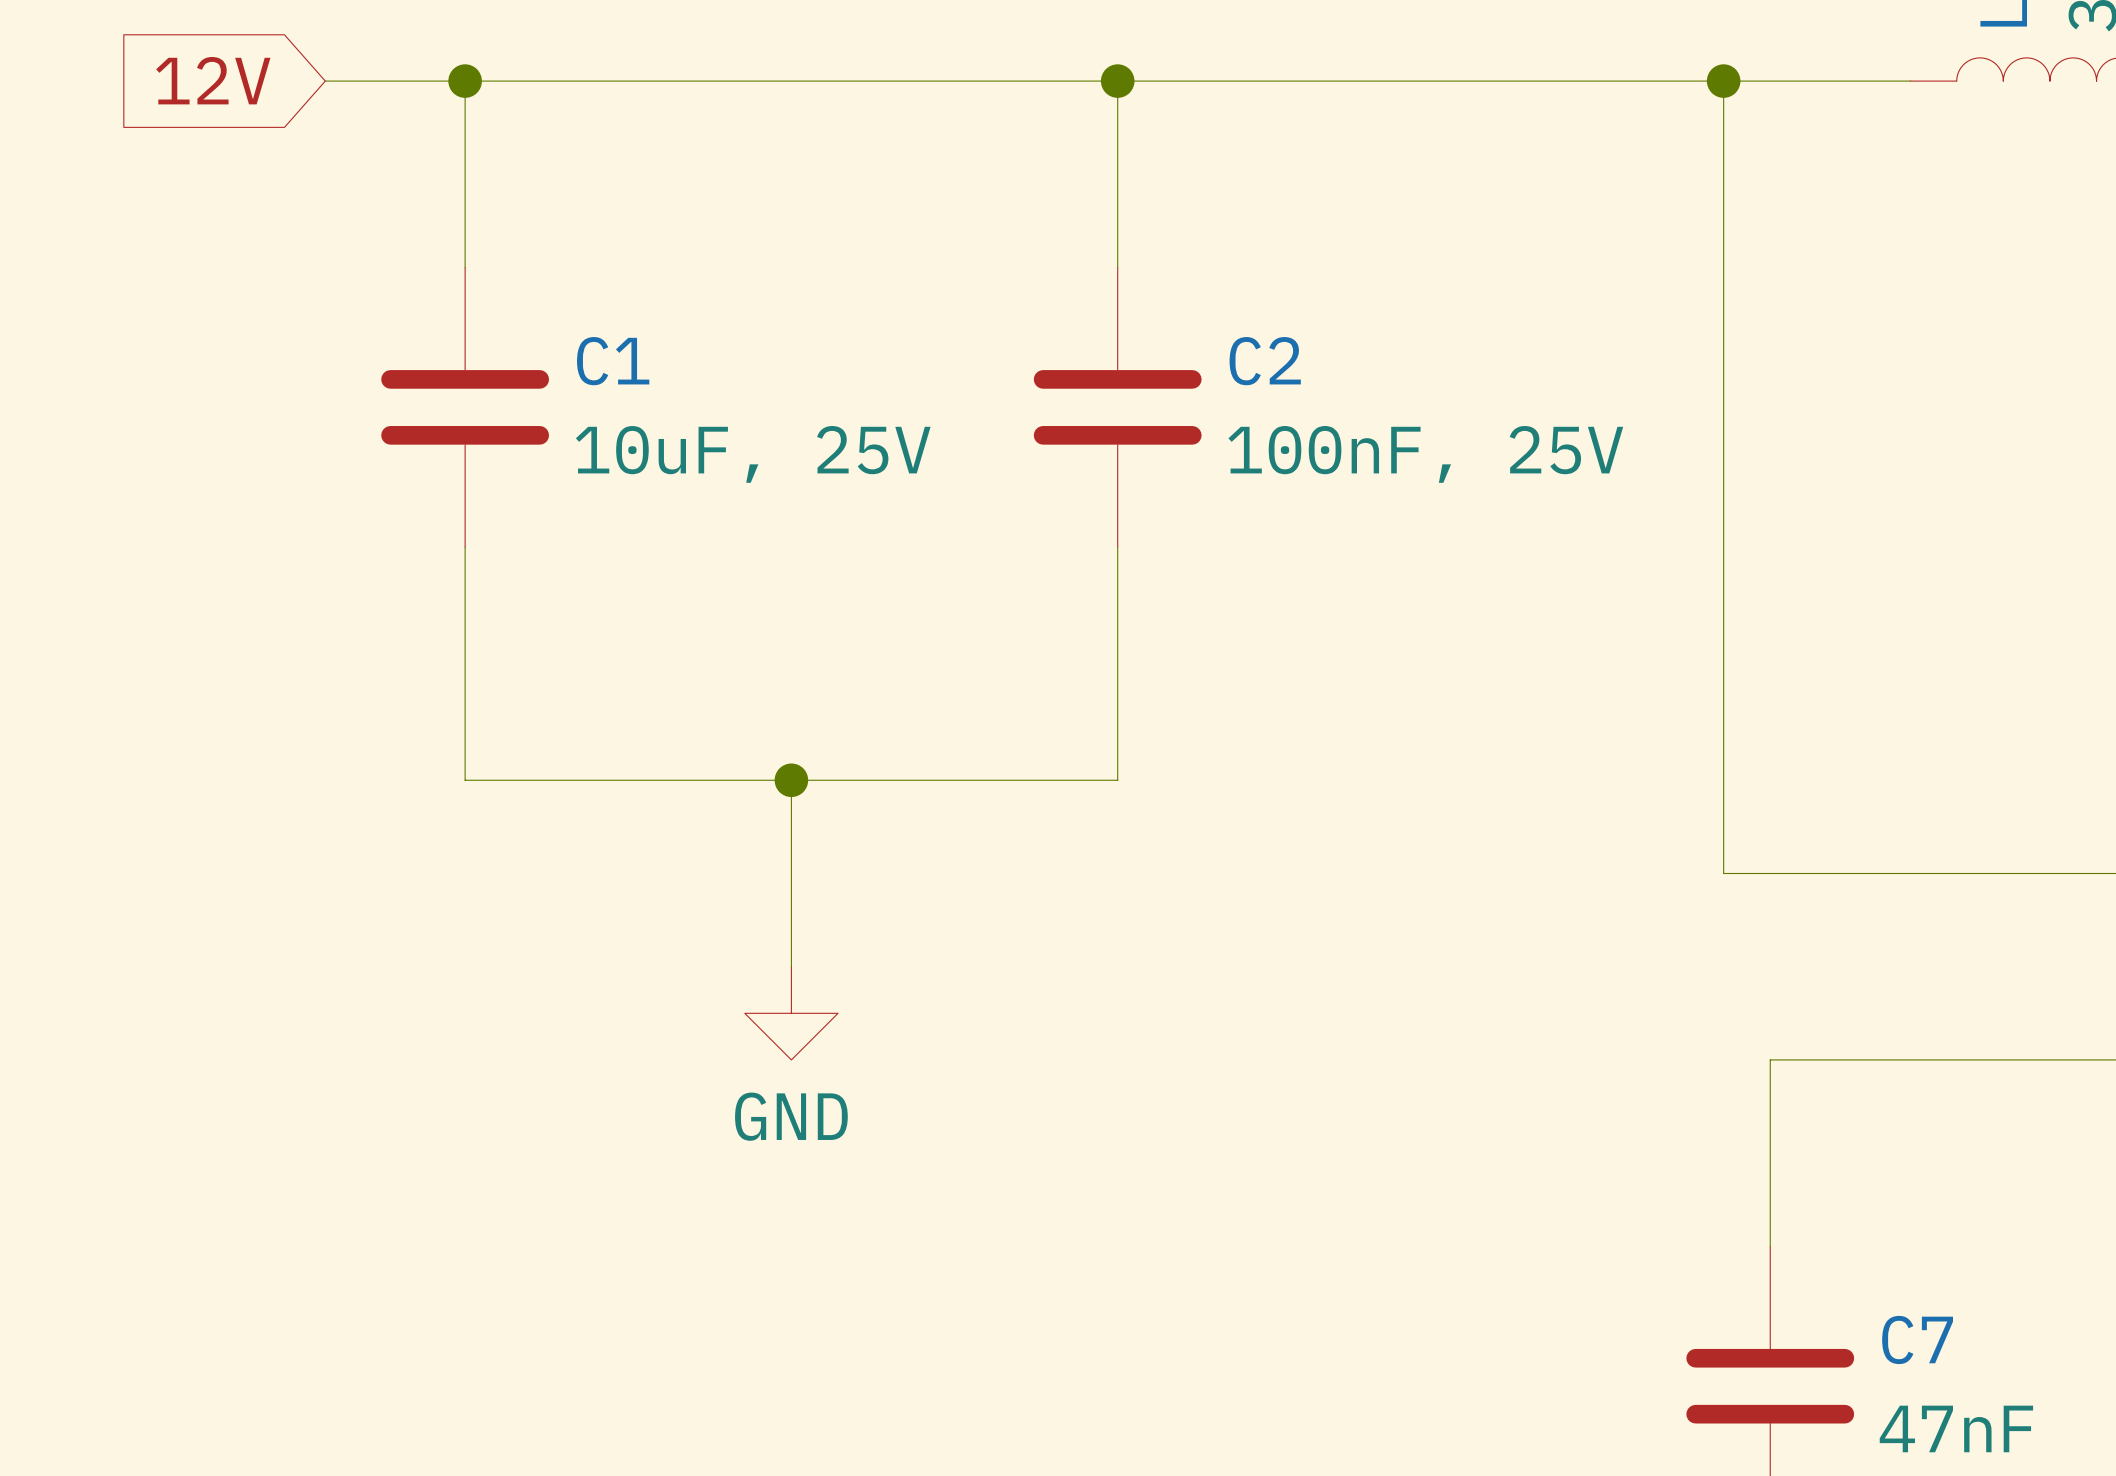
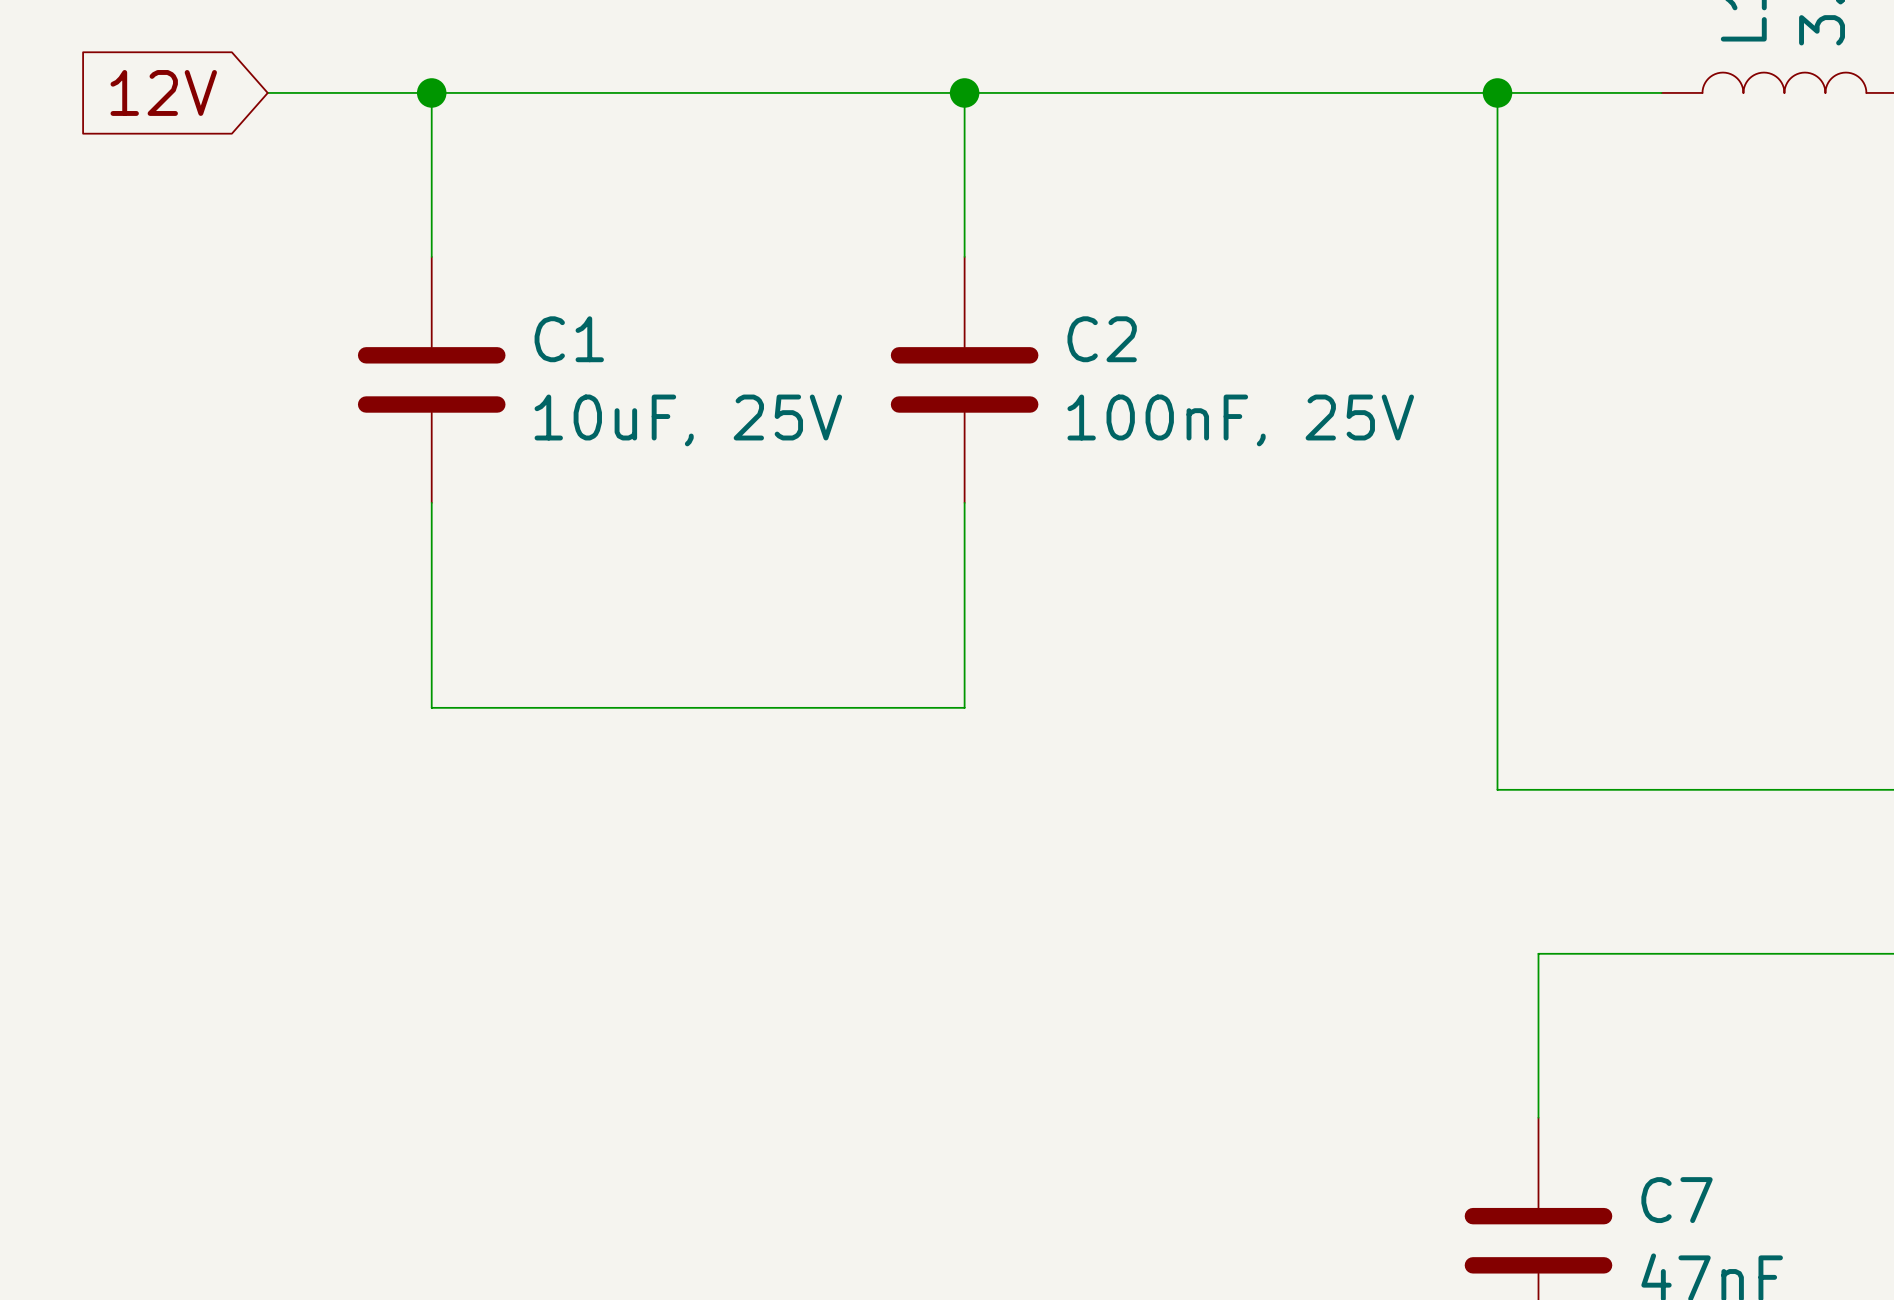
wire: (465, 81) (465, 267) -> (431, 92) (431, 256)
junction position: (465, 81) -> (431, 92)
C1 position: (465, 407) -> (431, 379)
wire: (465, 547) (465, 780) (511, 780) -> (431, 502) (431, 707)
wire: (791, 780) (791, 966) -> none
junction: (791, 780) -> none
power symbol: GND (791, 1013) -> none

